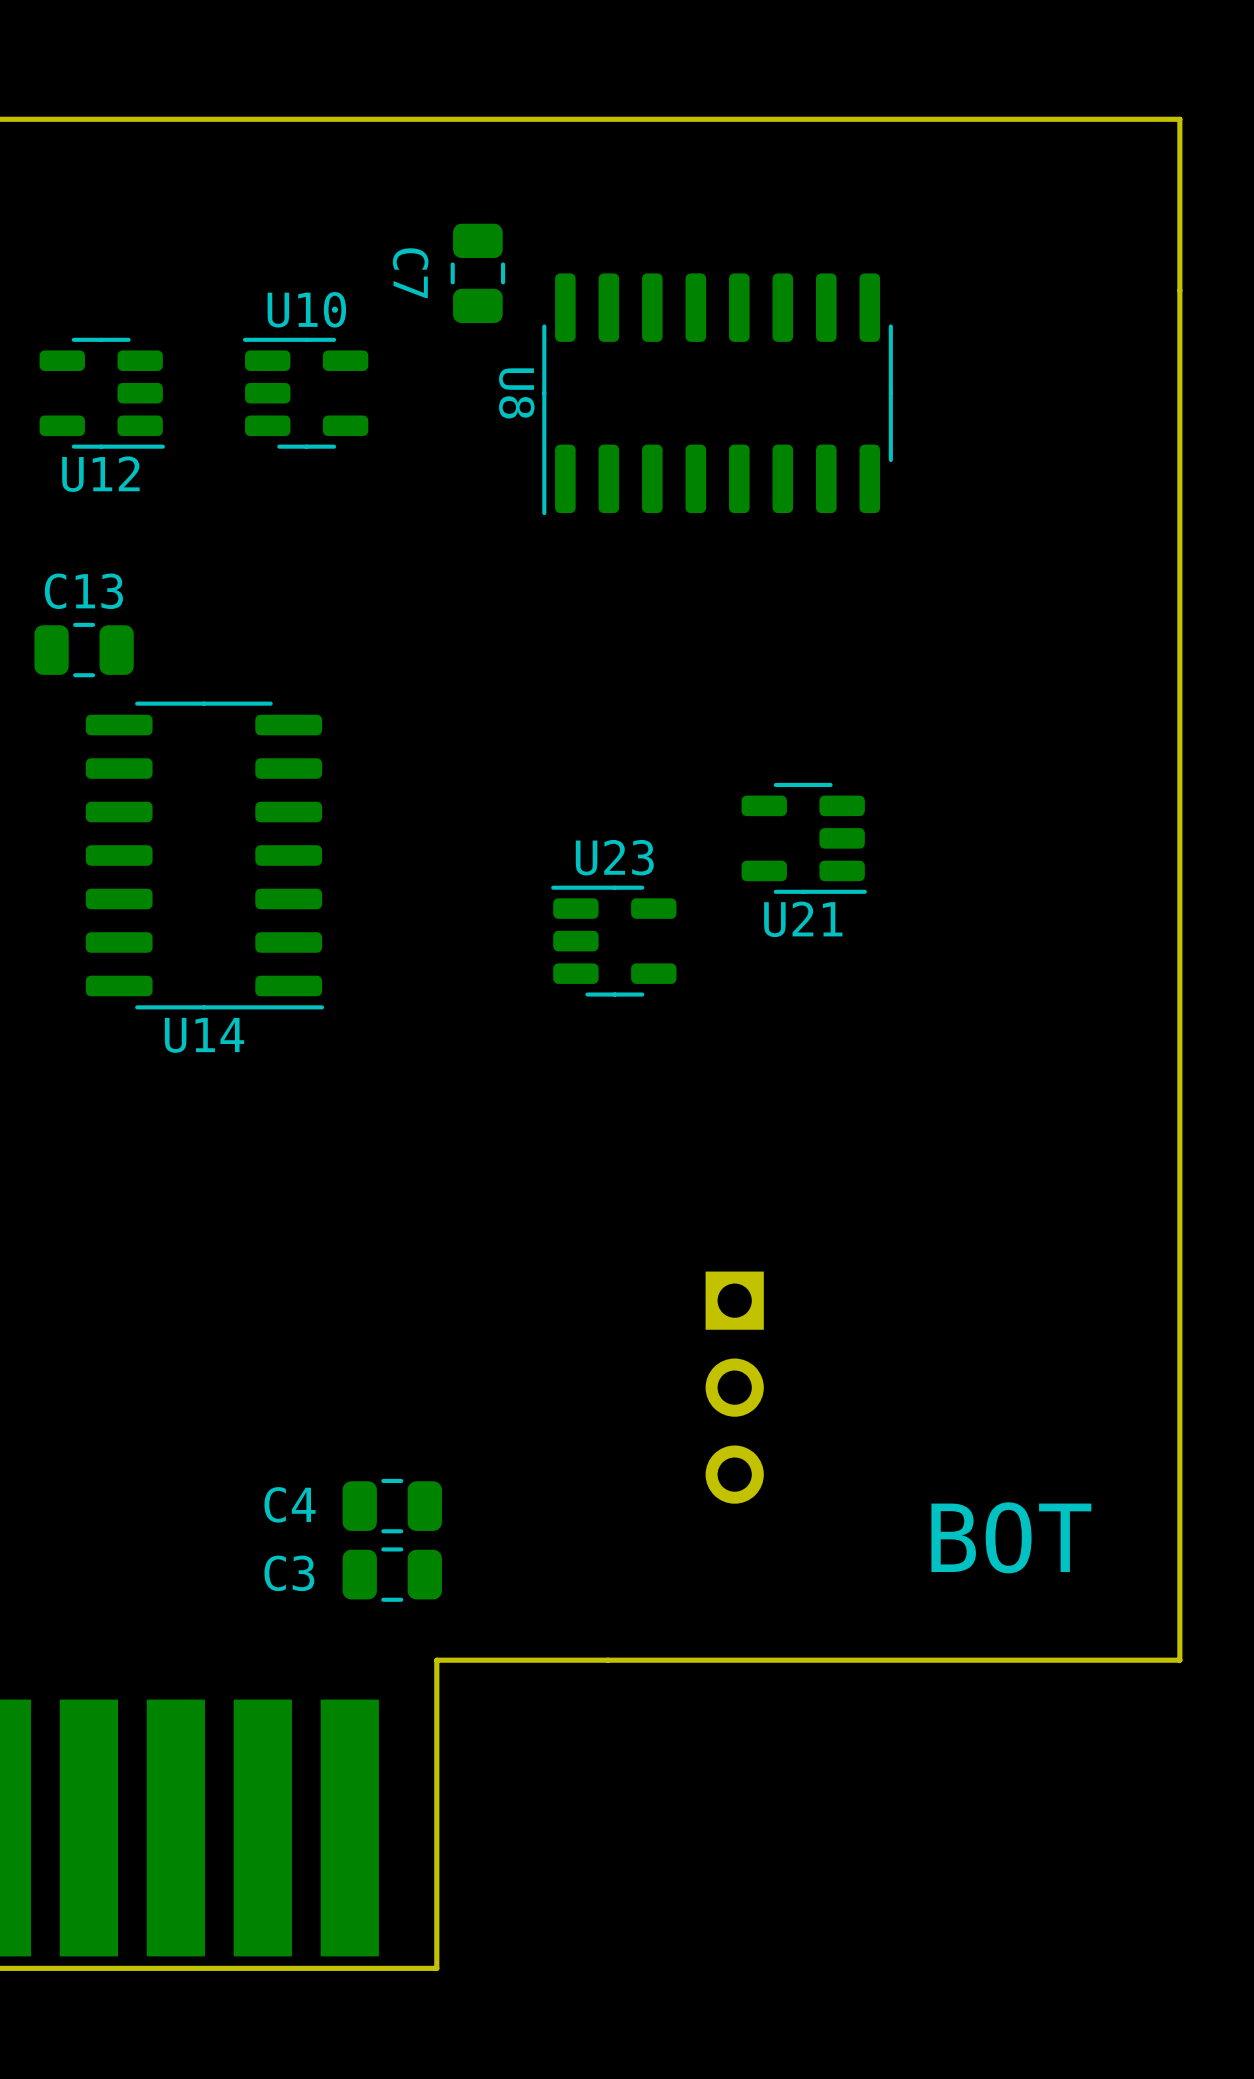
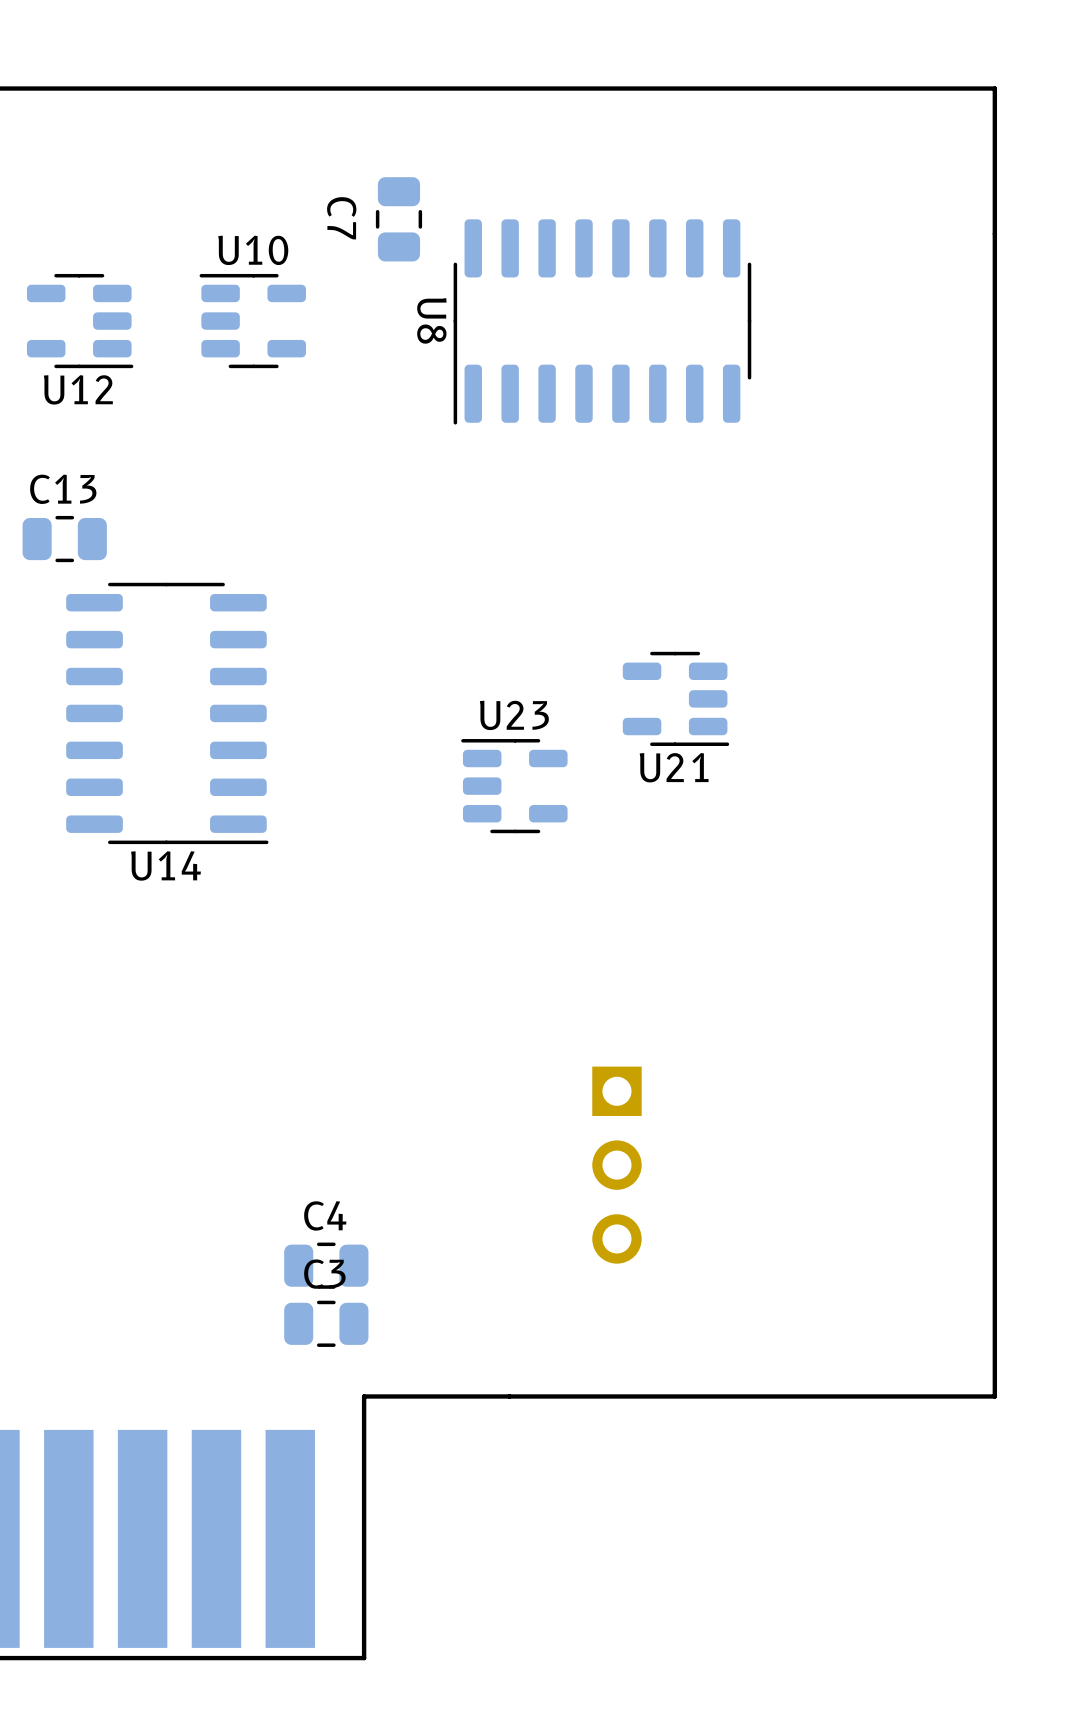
C4 name position: C4 (290, 1504) -> C4 (325, 1215)
text: BOT (1011, 1537) -> none
C3 name position: C3 (289, 1573) -> C3 (324, 1274)

